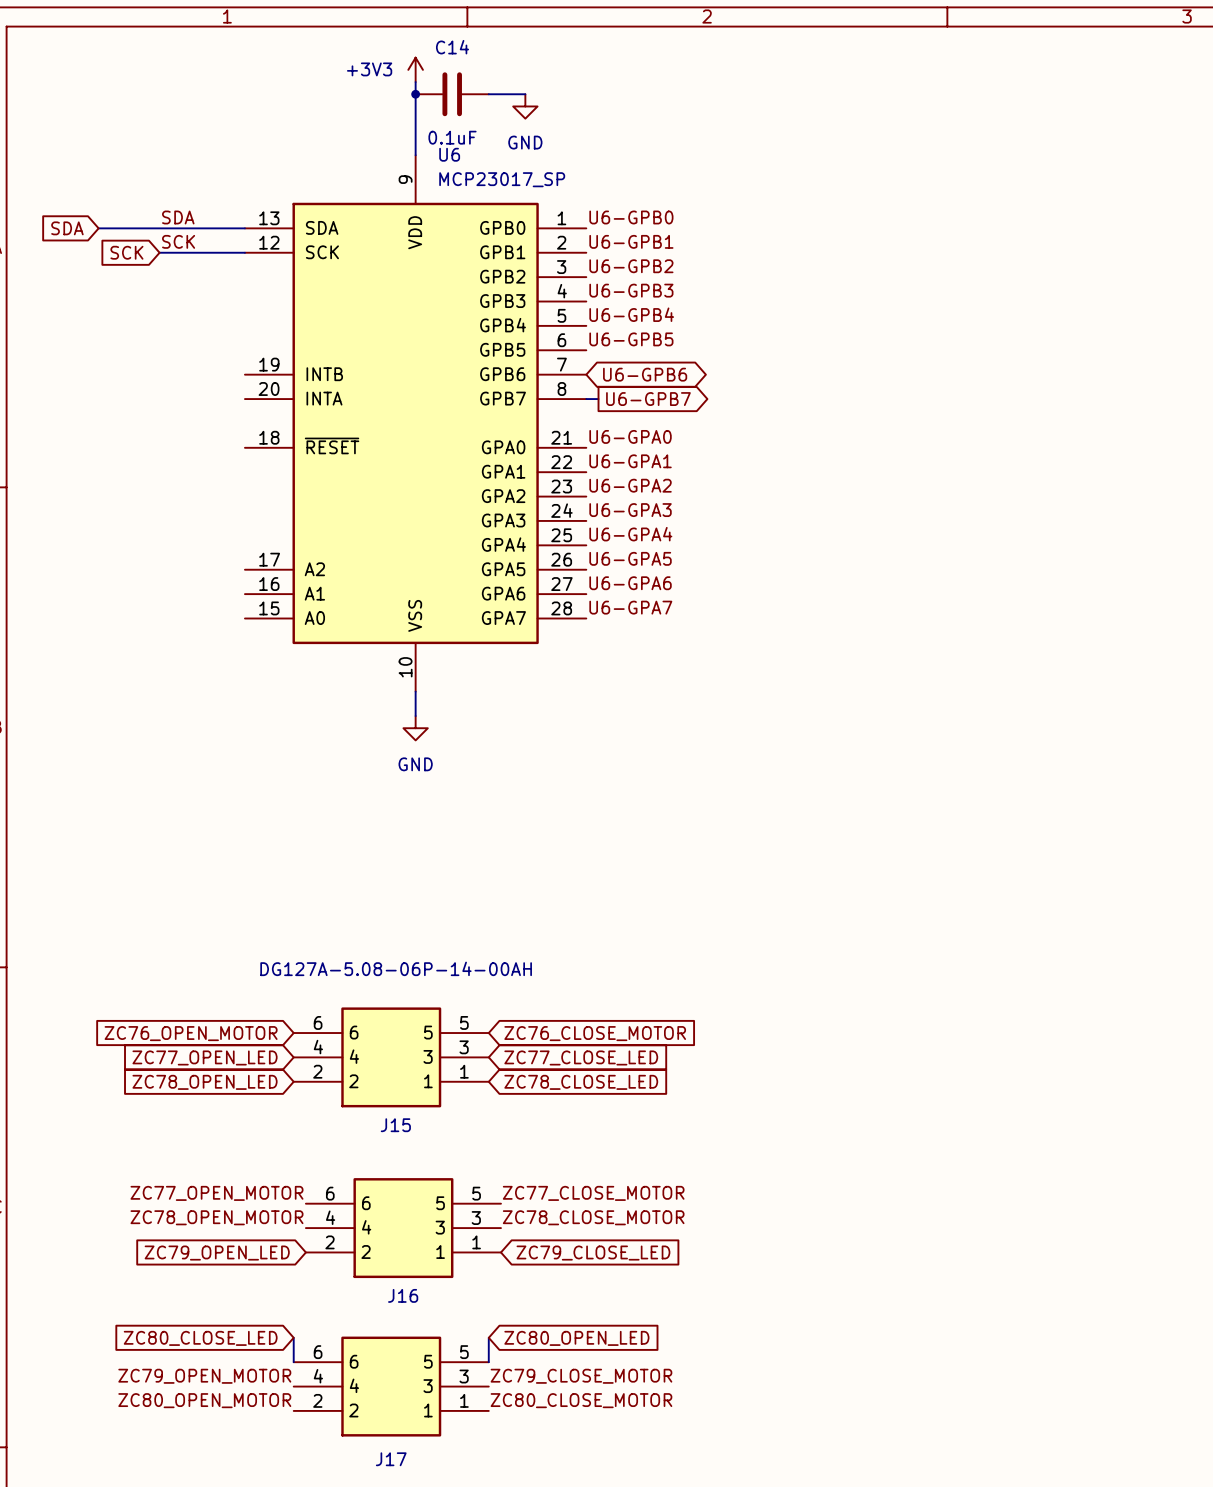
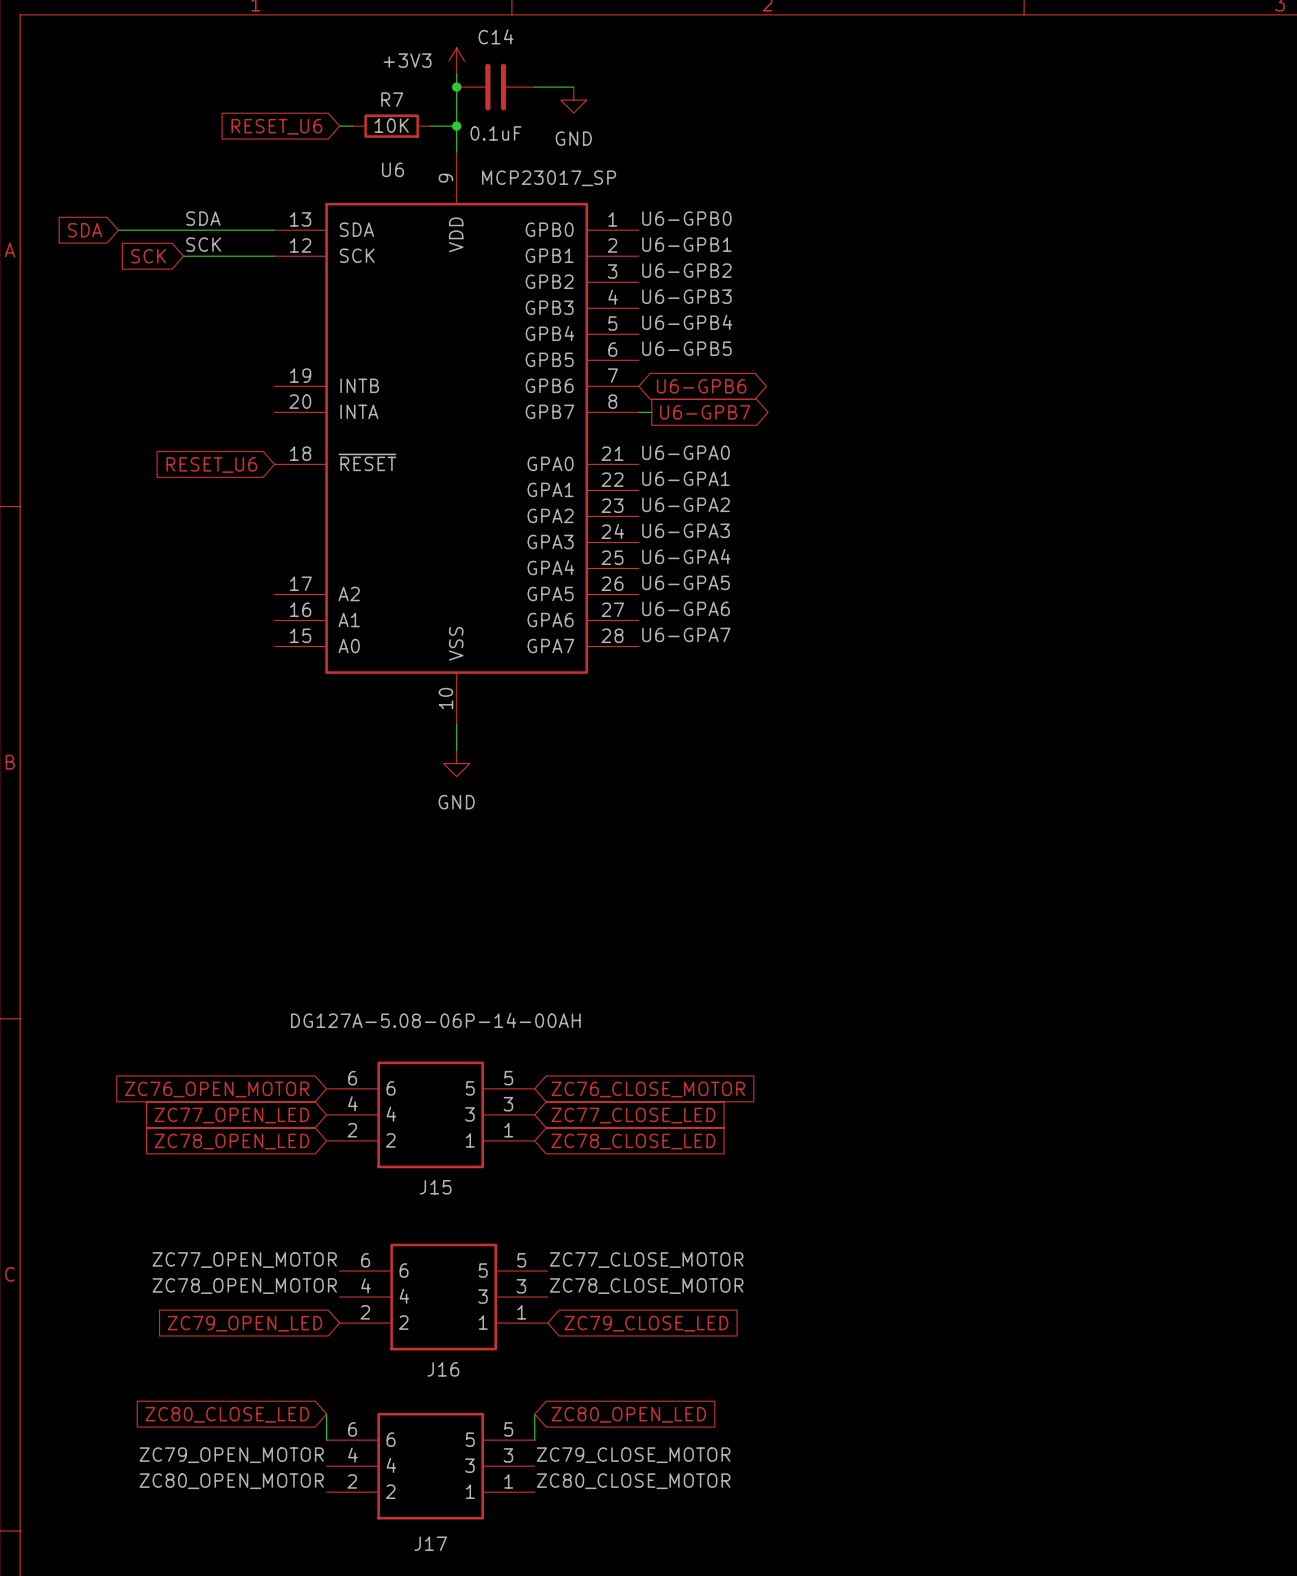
wire: none -> (339, 126) (352, 126)
R7: none -> 10K (391, 126)
wire: none -> (430, 126) (456, 126)
junction: none -> (456, 126)
global label: none -> RESET_U6 (276, 126)
U6 name position: U6 (449, 154) -> U6 (392, 169)
global label: none -> RESET_U6 (211, 465)

